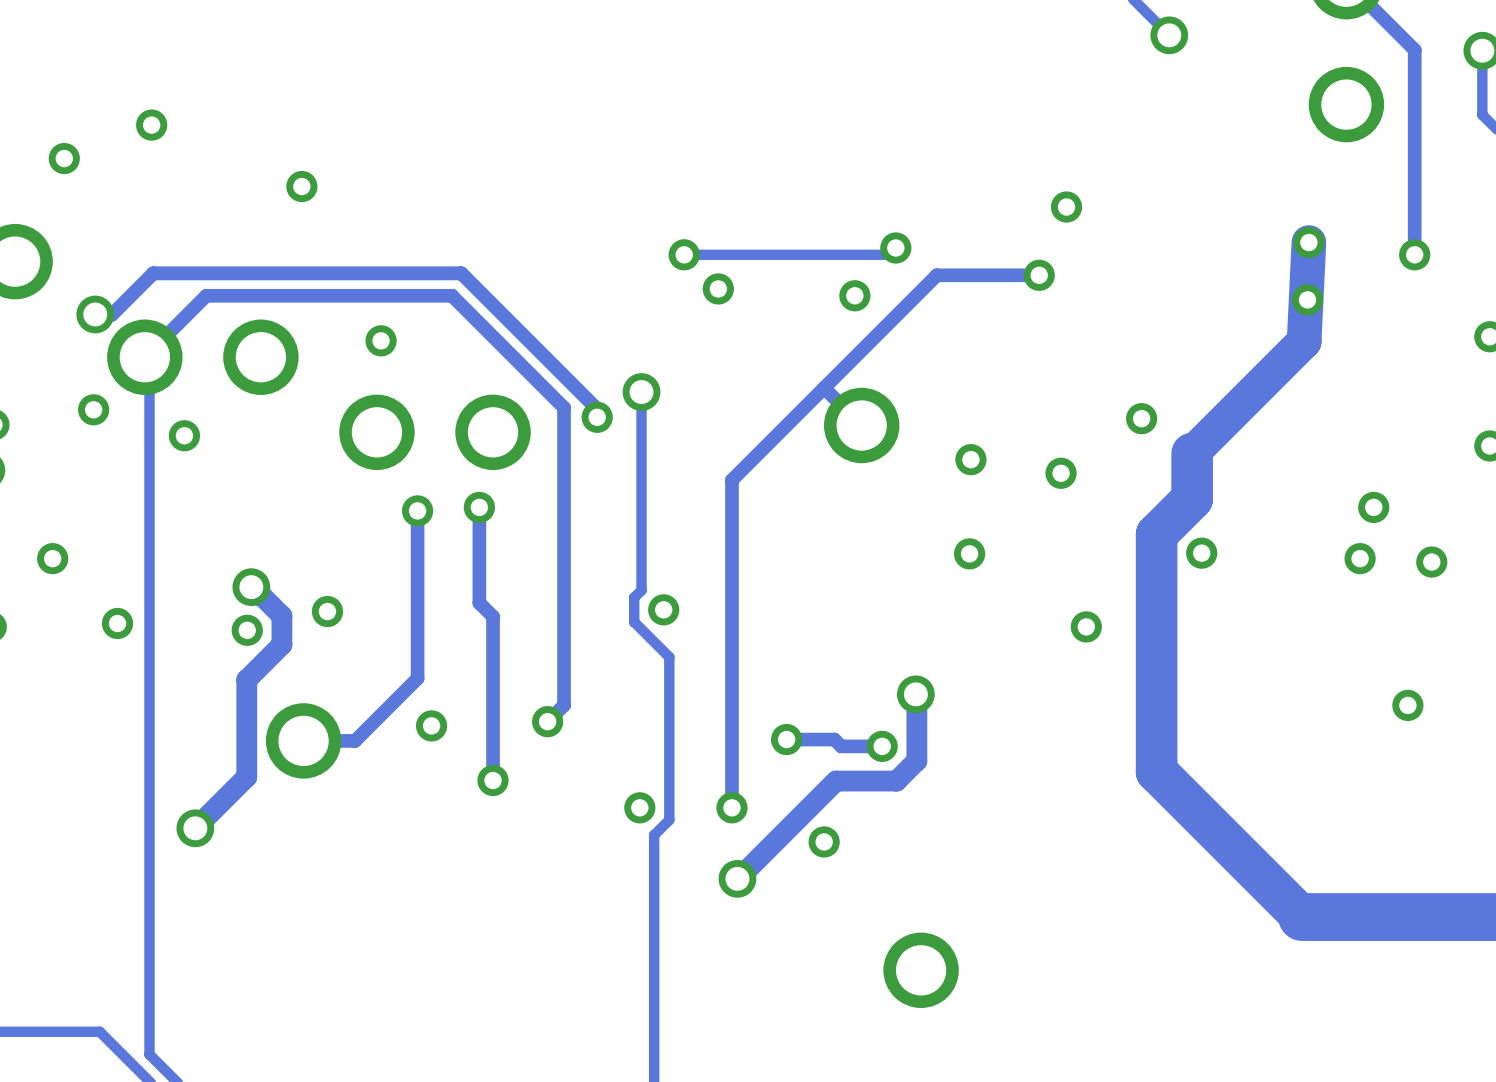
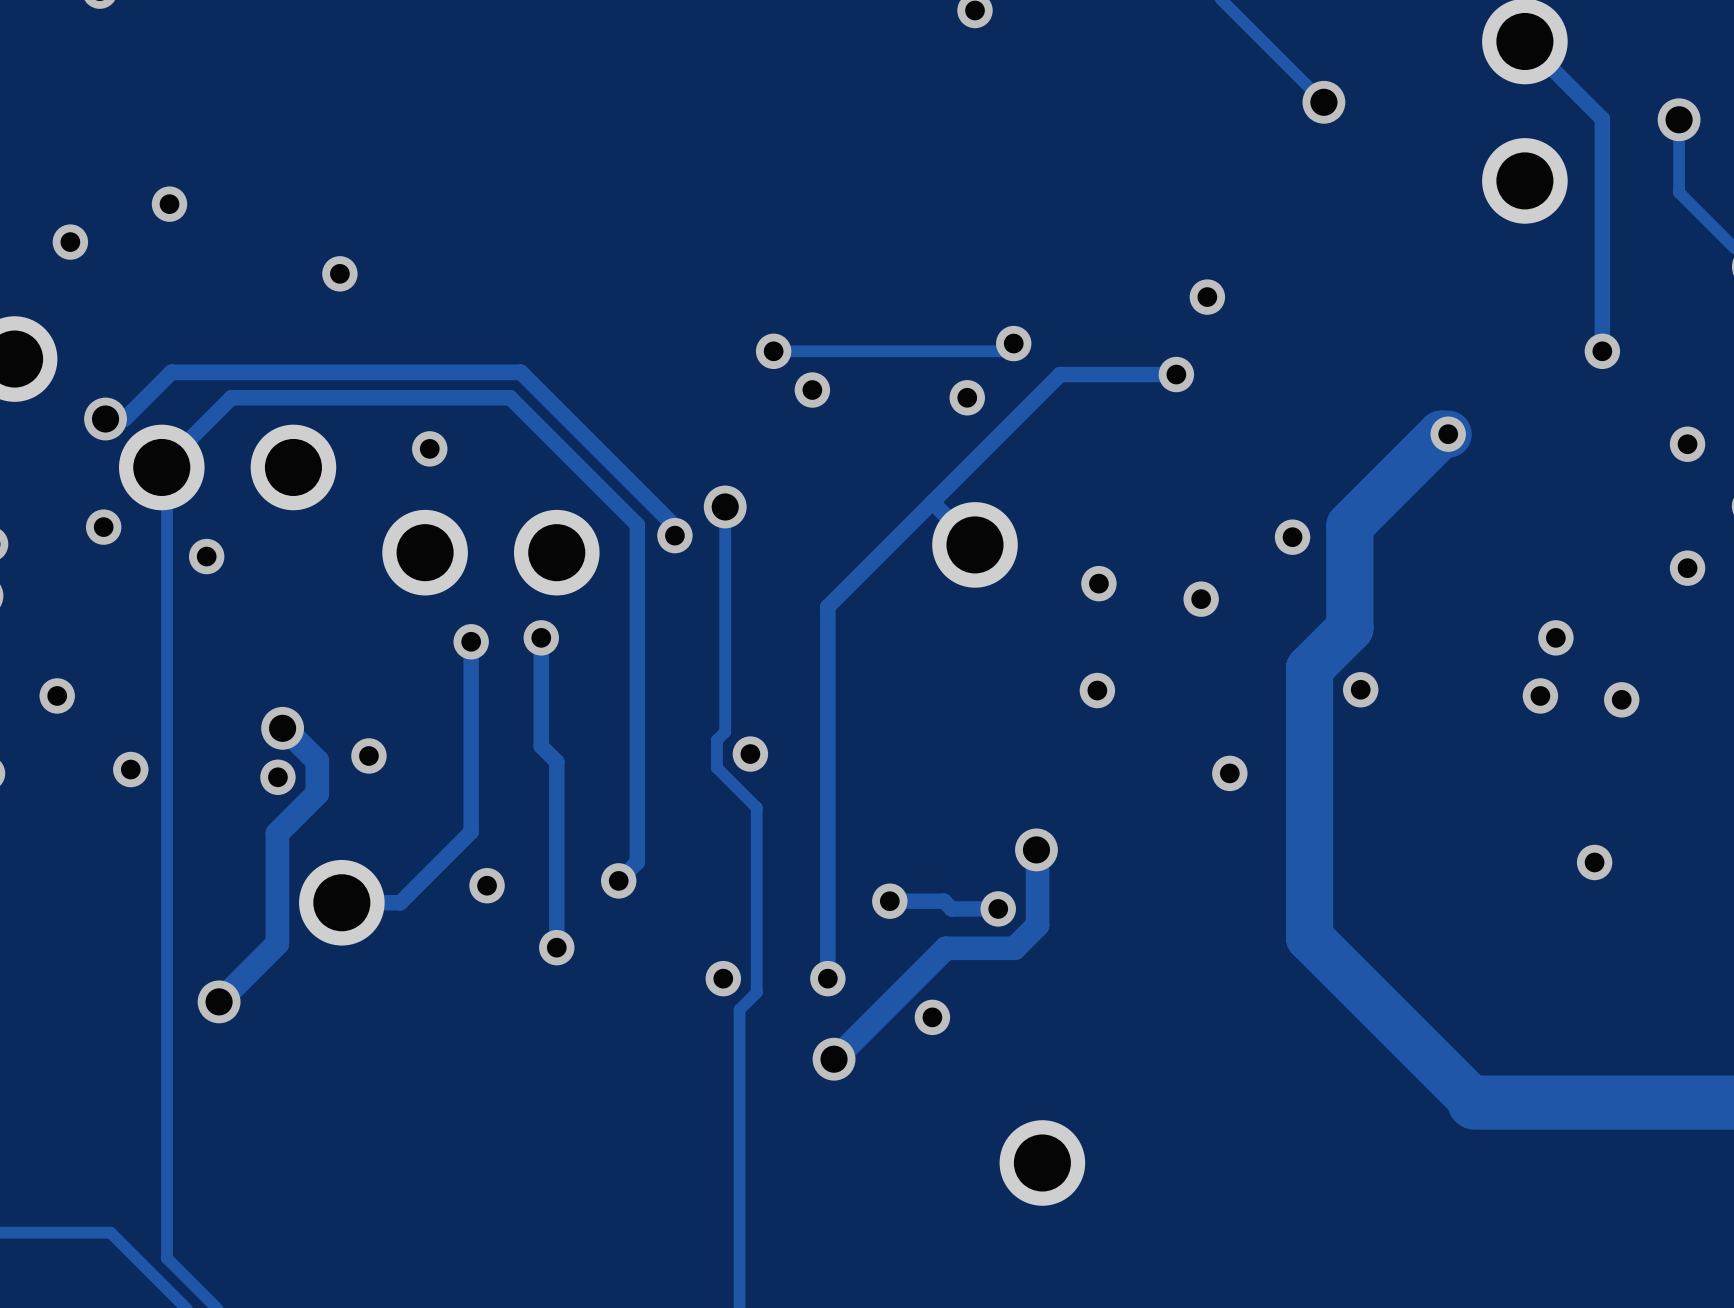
track: (1308, 242) (1304, 341) (1192, 453) -> (1448, 434) (1441, 434) (1349, 525) (1349, 576)
via: (1308, 242) -> none
via position: (1307, 299) -> (1448, 434)

